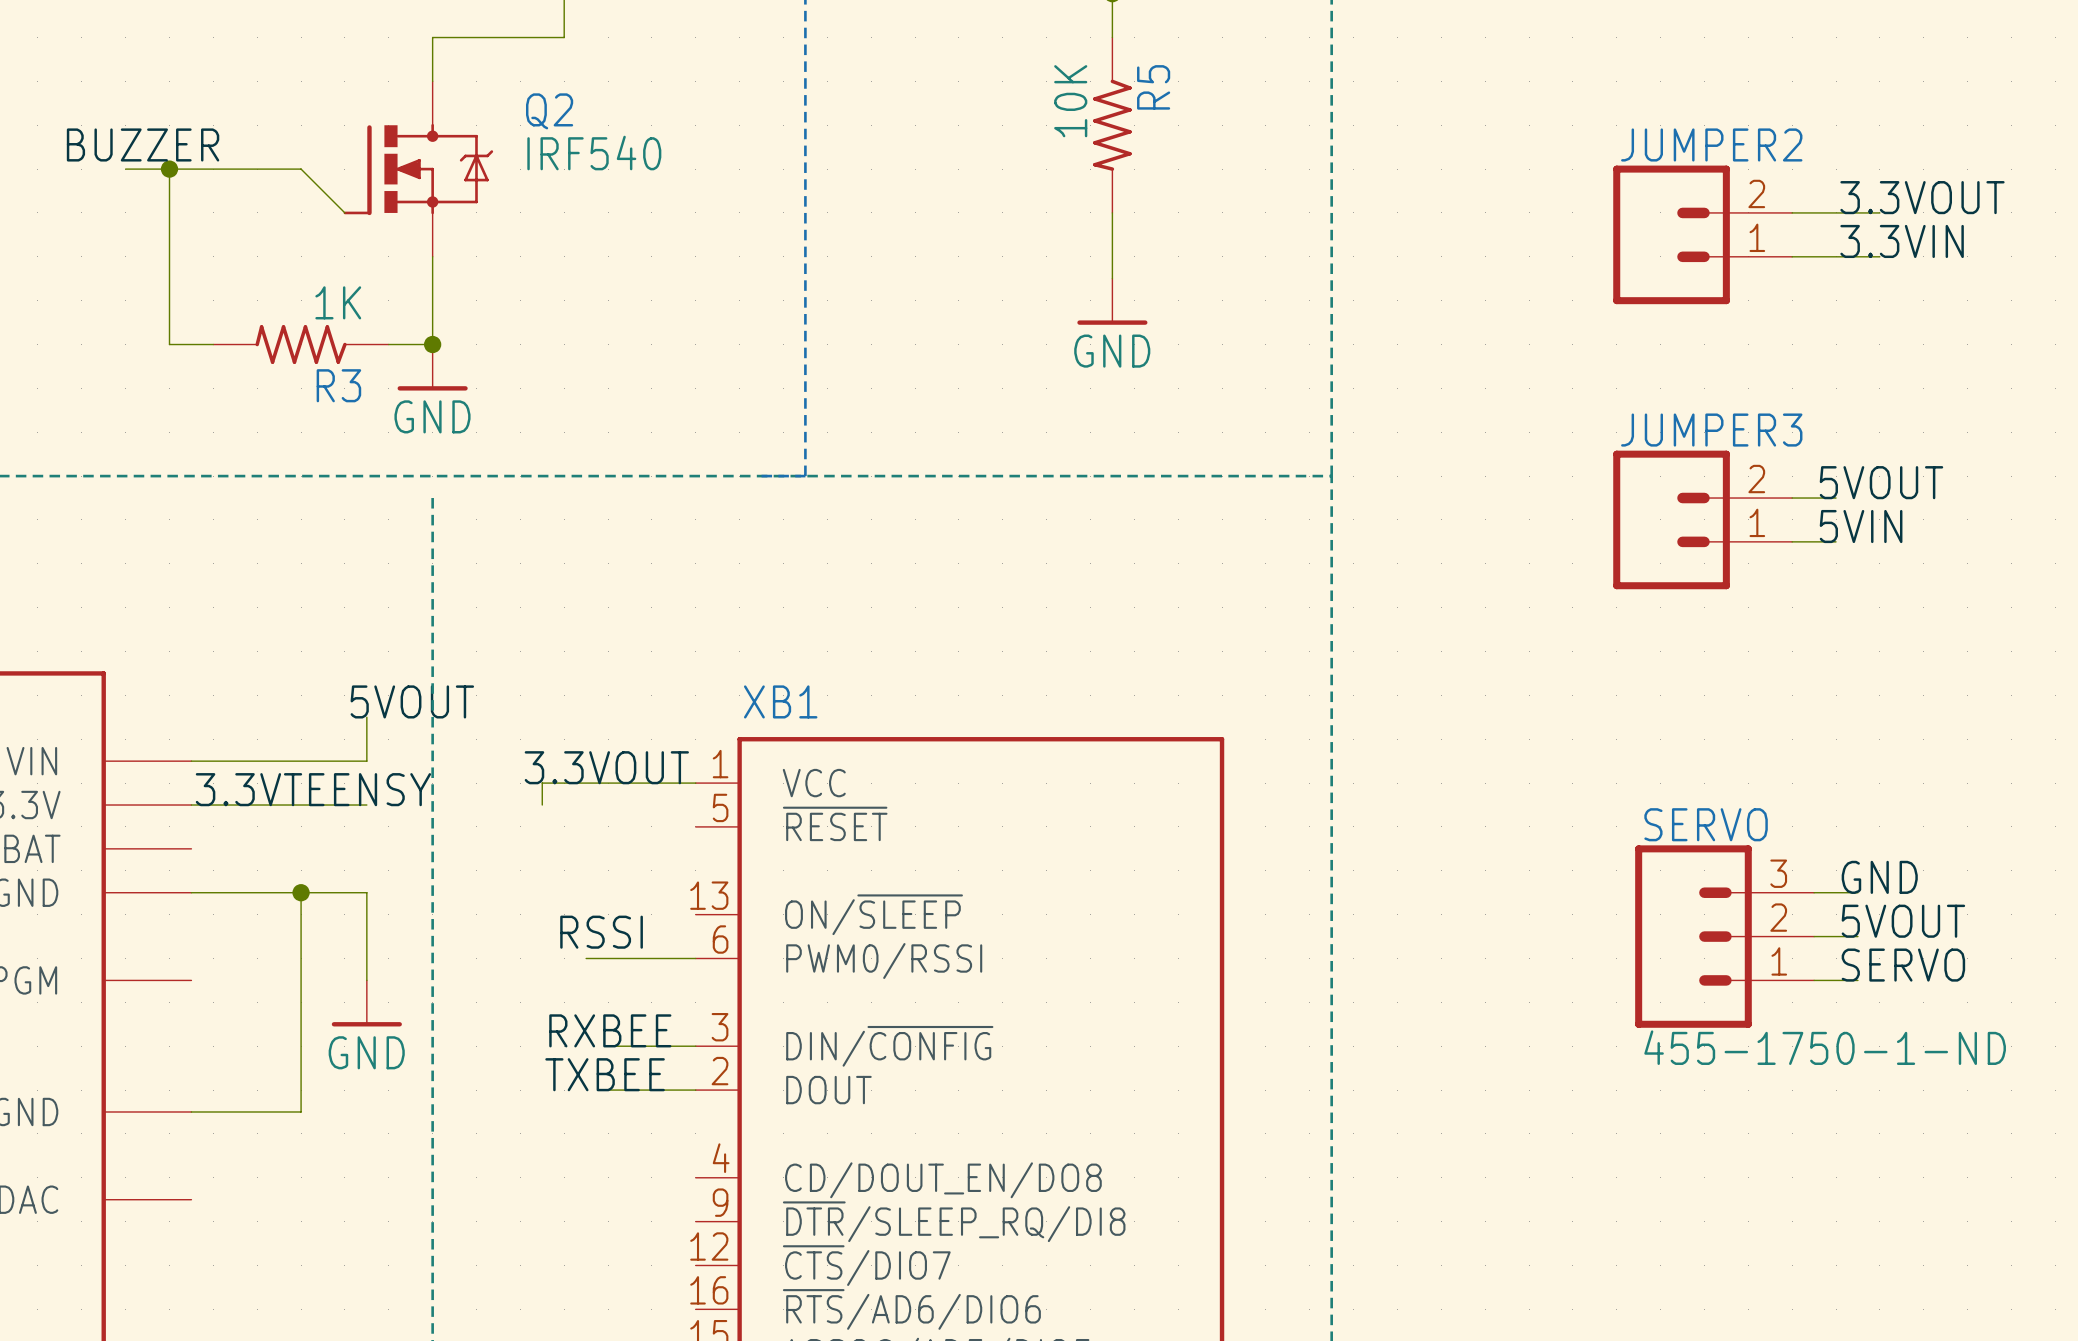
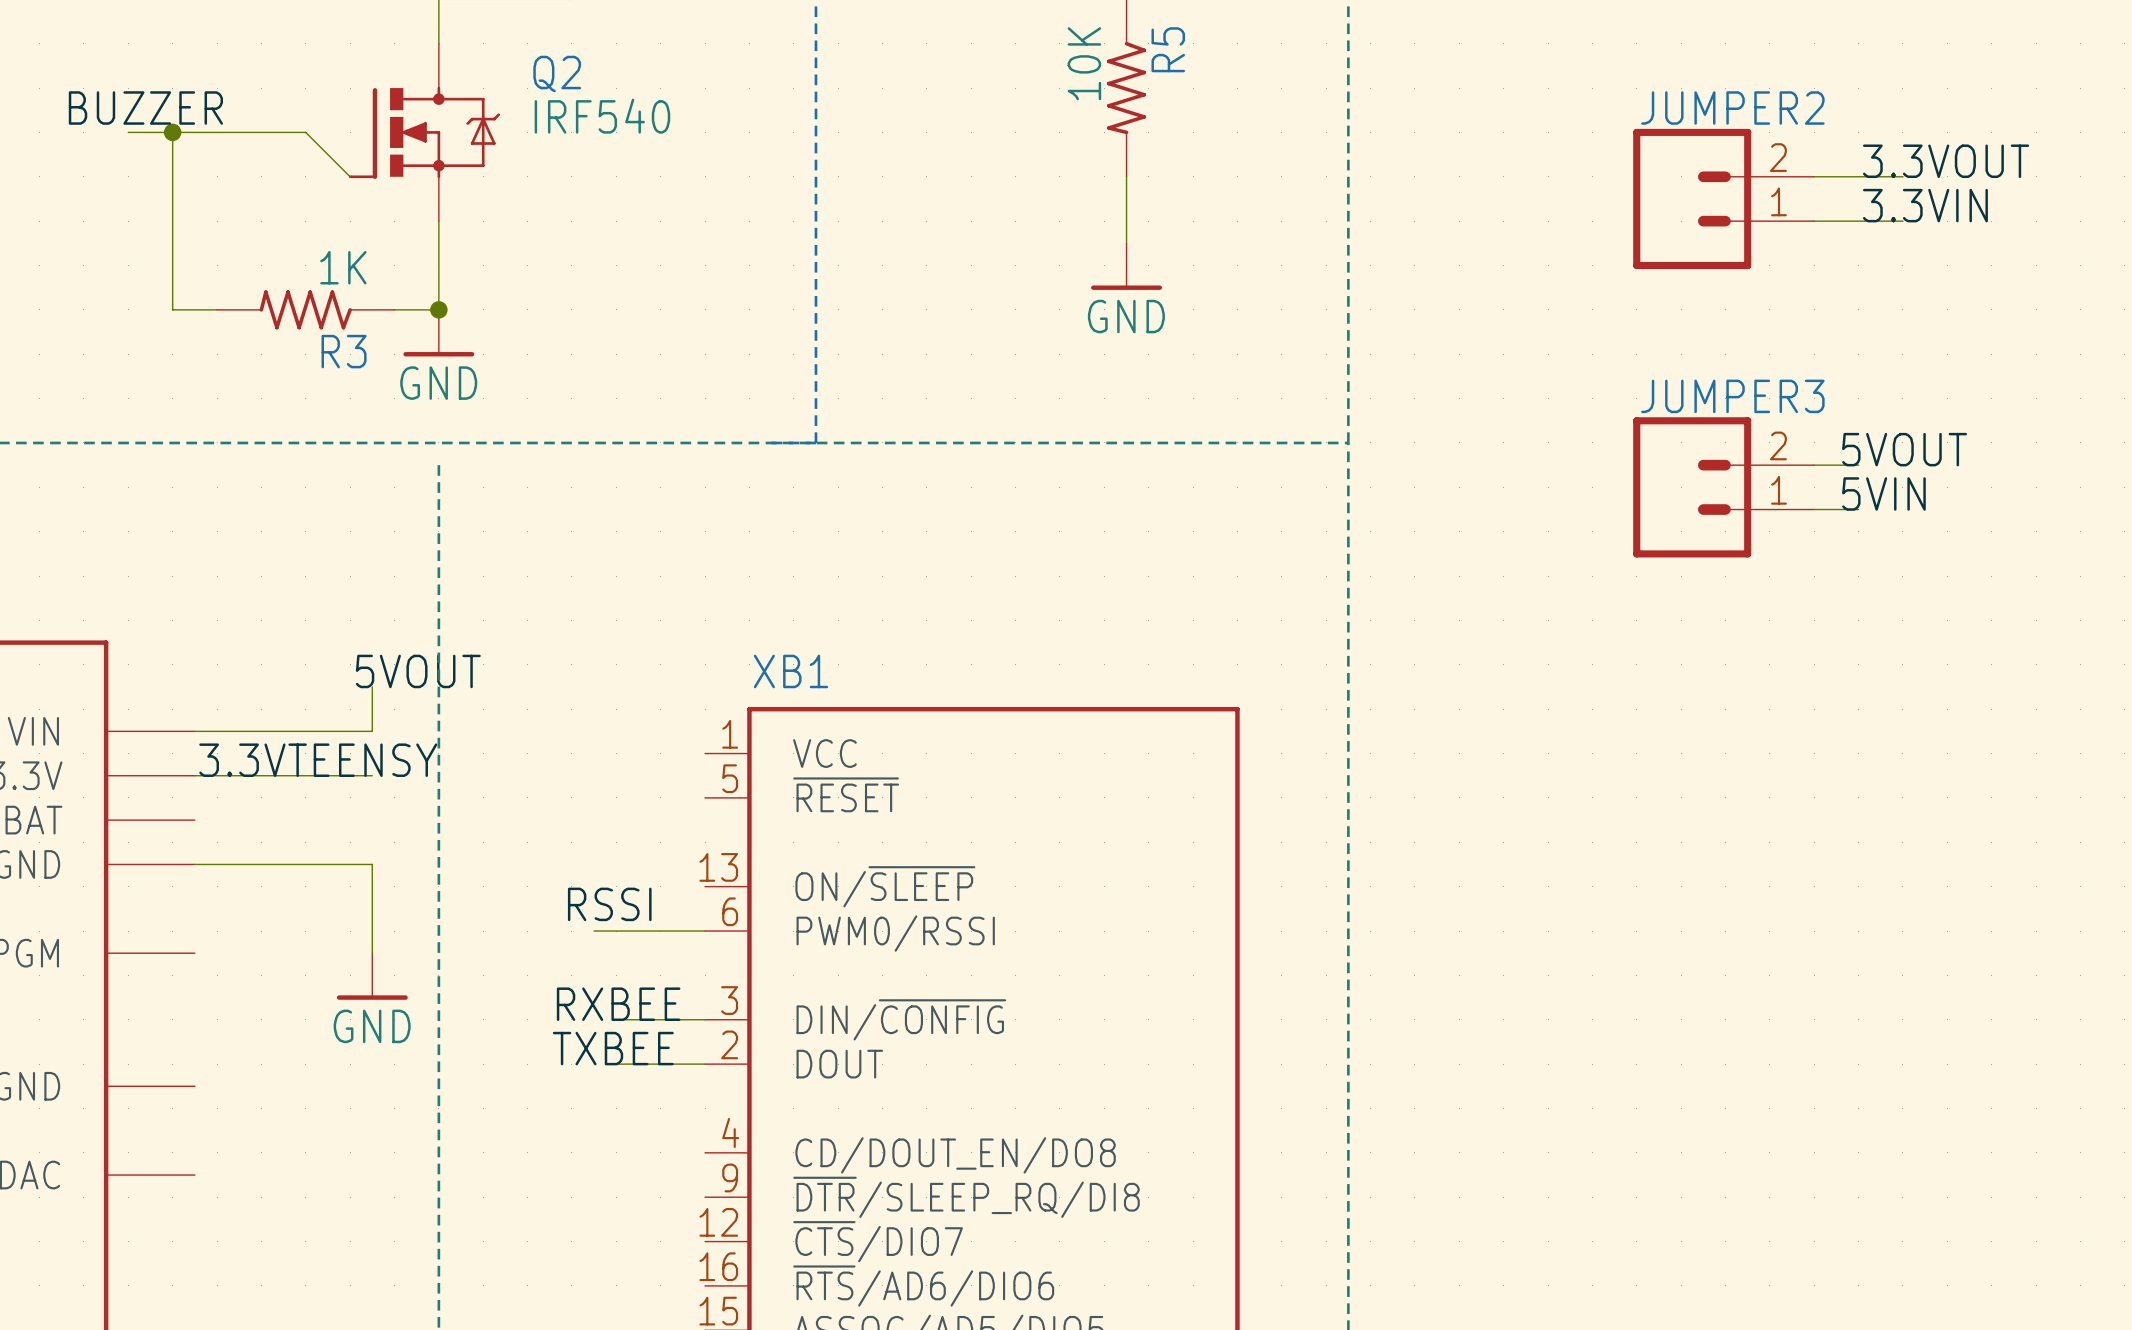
label: 3.3VOUT (606, 767) -> none
wire: (695, 783) (542, 783) (542, 805) -> none
label: GND (1879, 877) -> none
wire: (301, 892) (301, 1111) (191, 1111) -> none
junction: (301, 892) -> none
wire: (1814, 892) (1857, 892) -> none
label: 5VOUT (1903, 921) -> none
SERVO: 455-1750-1-ND (1724, 936) -> none
wire: (1814, 936) (1857, 936) -> none
label: SERVO (1903, 965) -> none
wire: (1814, 980) (1857, 980) -> none

